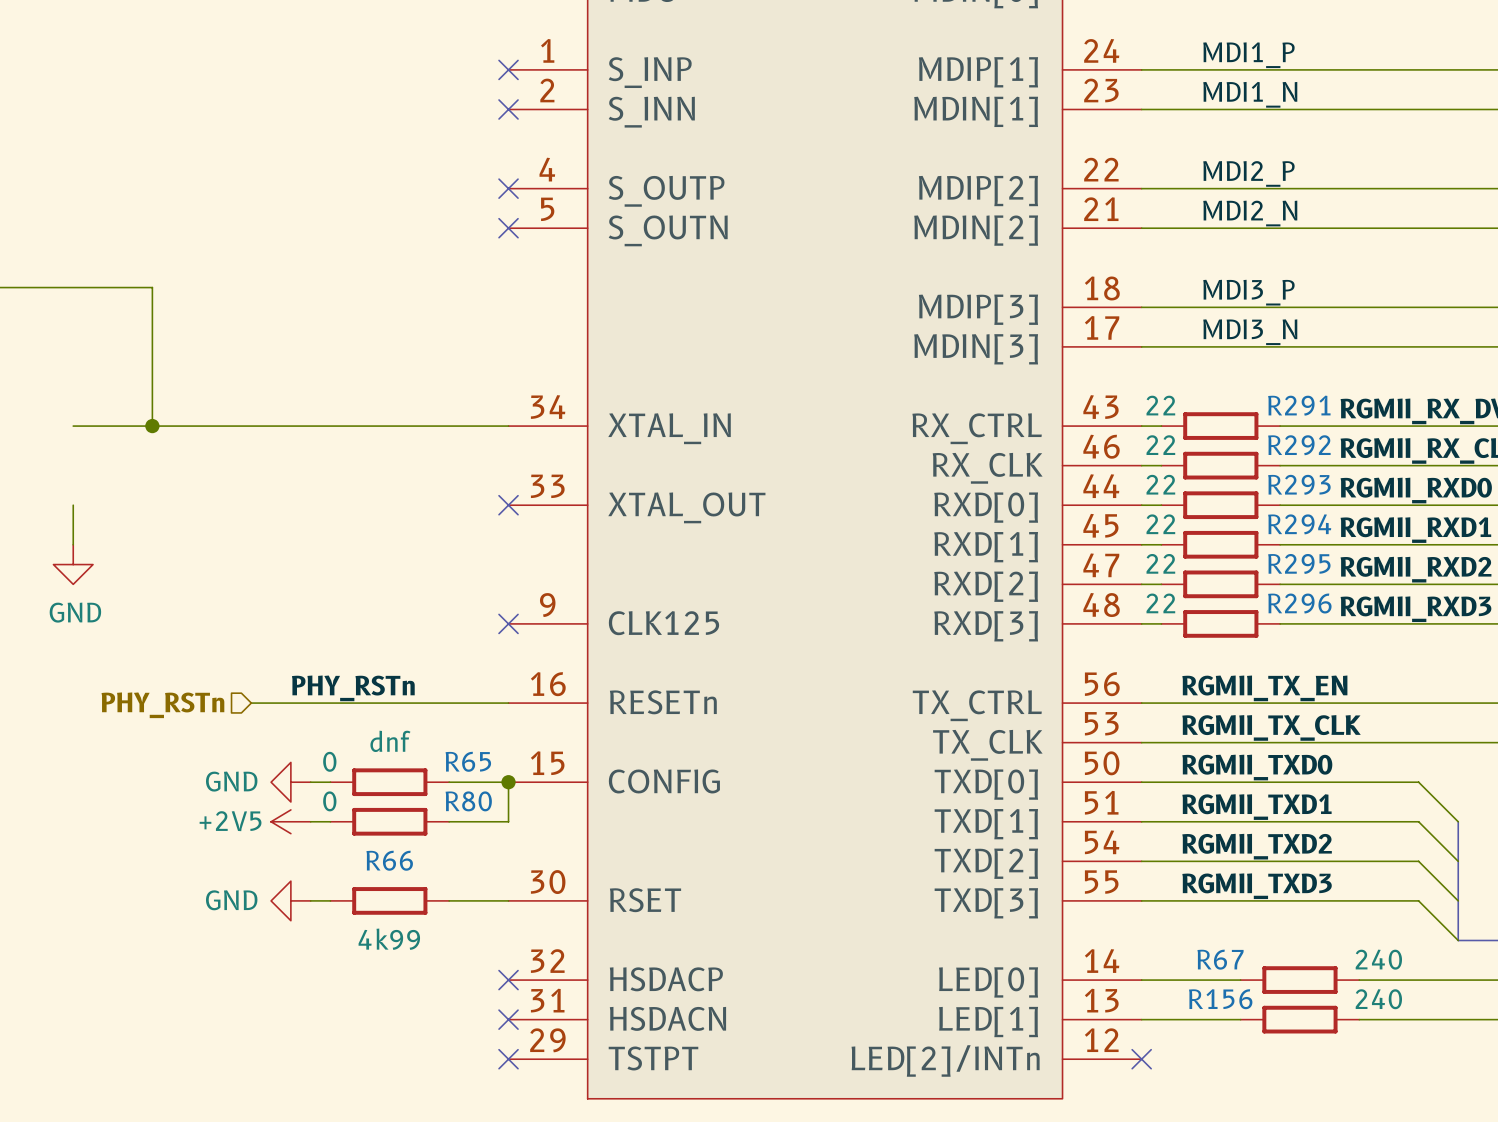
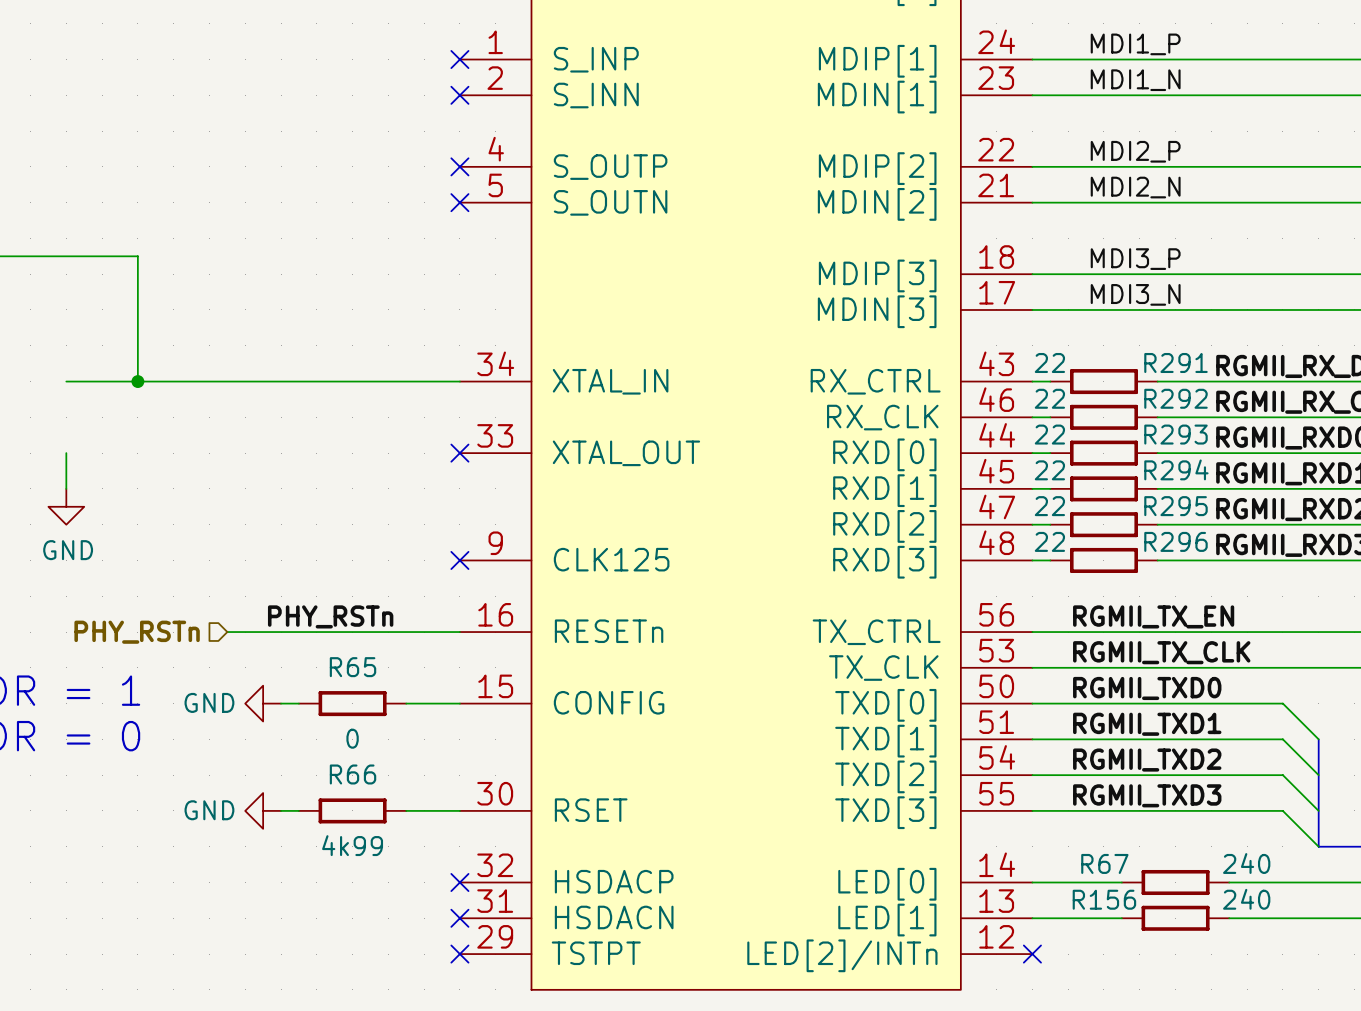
R65 text: dnf (390, 741) -> none
R65 text position: 0 (329, 761) -> 0 (352, 738)
R65 name position: R65 (468, 761) -> R65 (353, 667)
wire: (508, 782) (508, 821) (449, 821) -> none
junction: (508, 782) -> none
power symbol: +2V5 (290, 821) -> none
wire: (310, 821) (330, 821) -> none
R80: (389, 821) -> none

